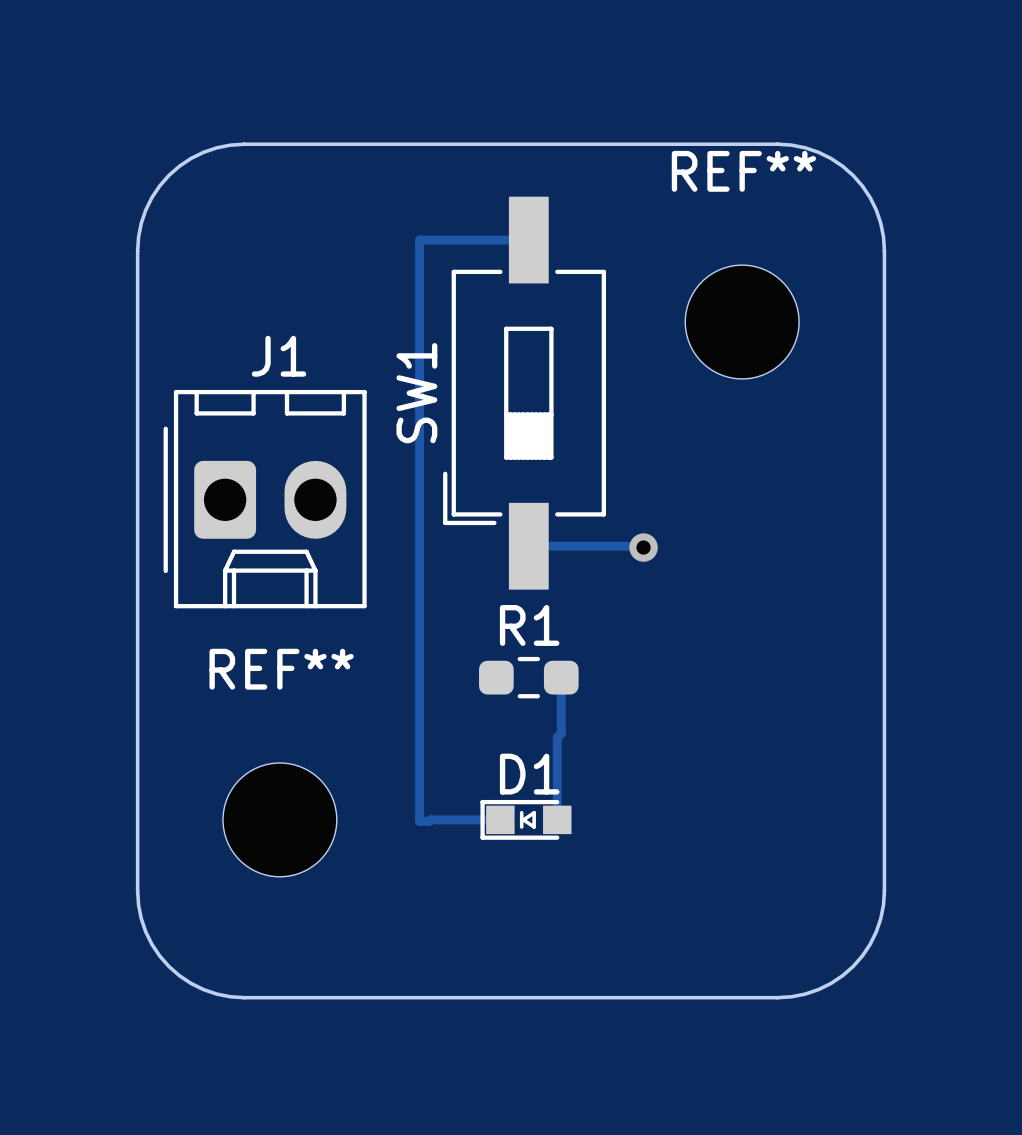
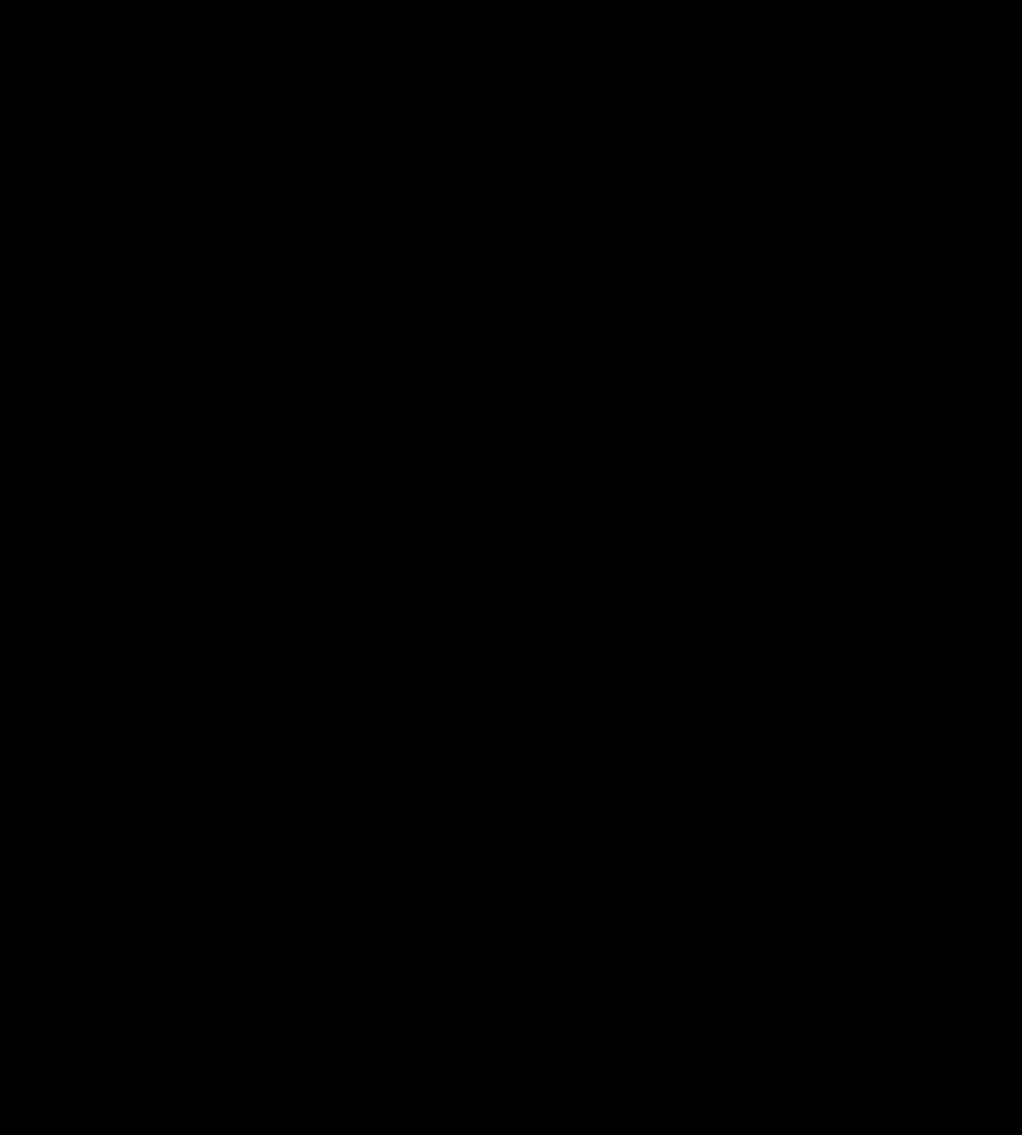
board edge: (244, 144) (791, 145) (805, 147) (831, 158) (842, 166) (862, 185) (876, 210) (880, 223) (884, 250) (884, 891) (880, 918) (870, 944) (862, 955) (842, 975) (818, 989) (805, 994) (777, 997) (244, 997) (230, 996) (203, 989) (179, 975) (159, 955) (151, 944) (141, 918) (137, 891) (138, 236) (145, 210) (159, 185) (168, 175) (190, 158) (203, 152) (216, 147) (244, 144) -> none
track: (419, 240) (528, 240) -> none
track: (419, 240) (419, 821) (500, 819) -> none
REF**: (742, 322) -> none
SW1: (524, 393) -> none
J1: (265, 499) -> none
track: (528, 546) (643, 547) -> none
via: (643, 547) -> none
R1: (528, 677) -> none
track: (561, 677) (561, 733) -> none
track: (561, 733) (557, 737) (557, 819) -> none
REF**: (279, 819) -> none
D1: (525, 819) -> none

